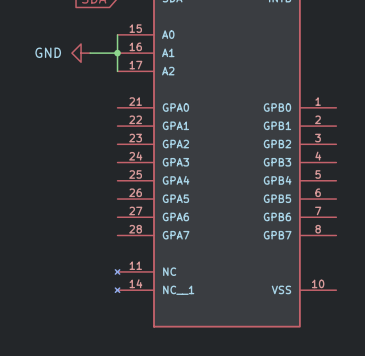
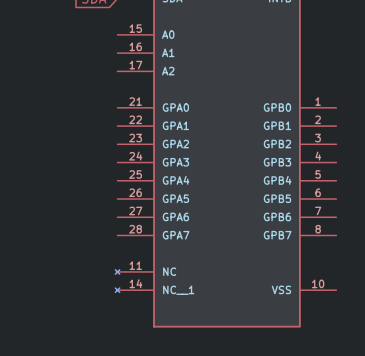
wire: (117, 34) (117, 71) -> none
power symbol: GND (81, 53) -> none
wire: (90, 53) (117, 53) -> none
junction: (117, 53) -> none

